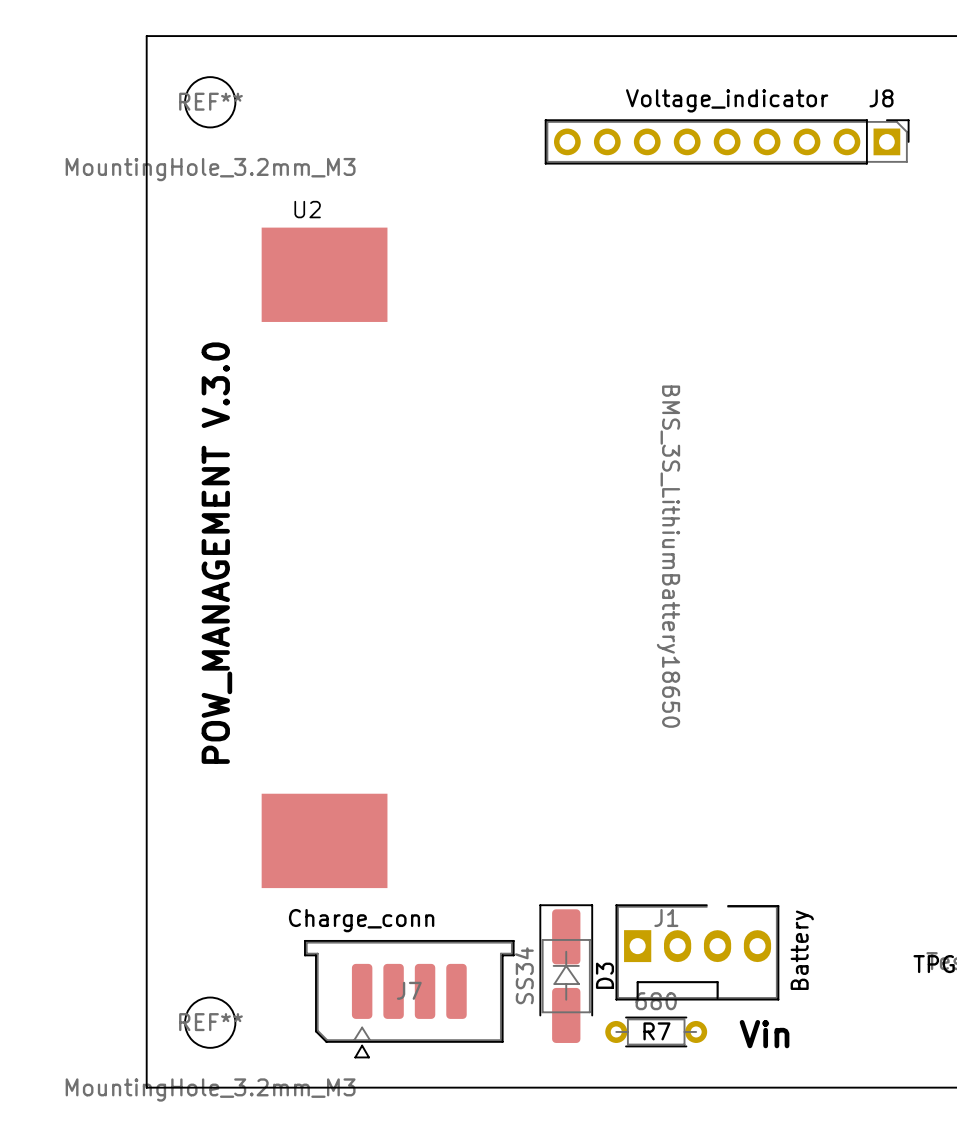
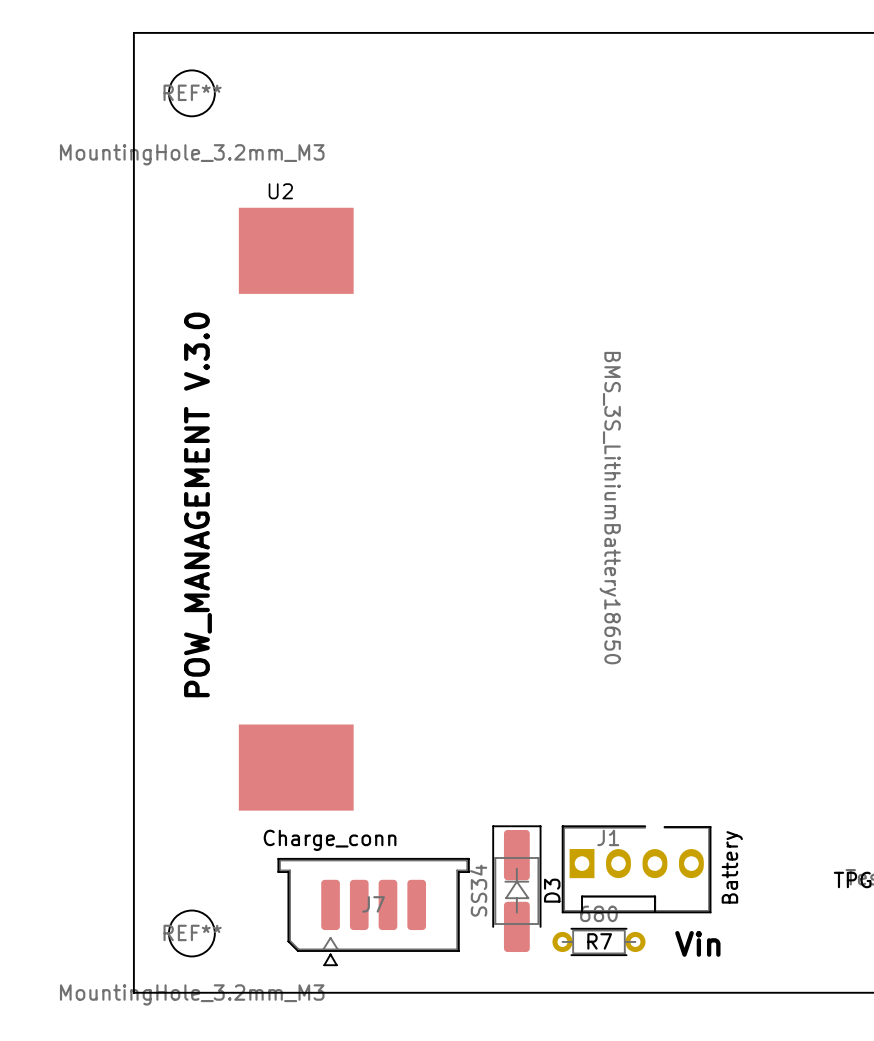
J8: Voltage_indicator (727, 141) -> none

